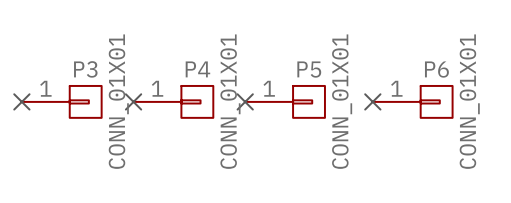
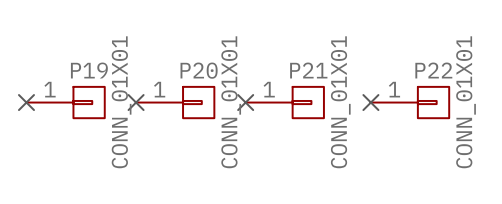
P3 name: P3 (85, 69) -> P19 (89, 70)
P4 name: P4 (197, 69) -> P20 (199, 70)
P5 name: P5 (309, 69) -> P21 (308, 70)
P6 name: P6 (436, 69) -> P22 (433, 70)

